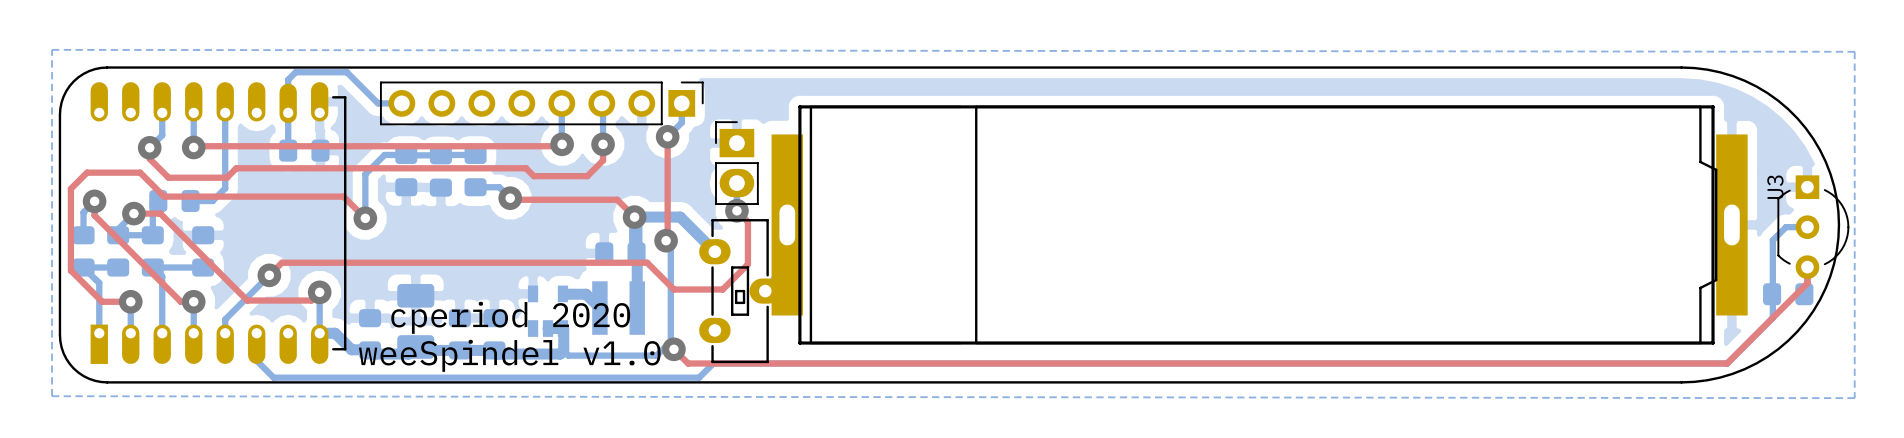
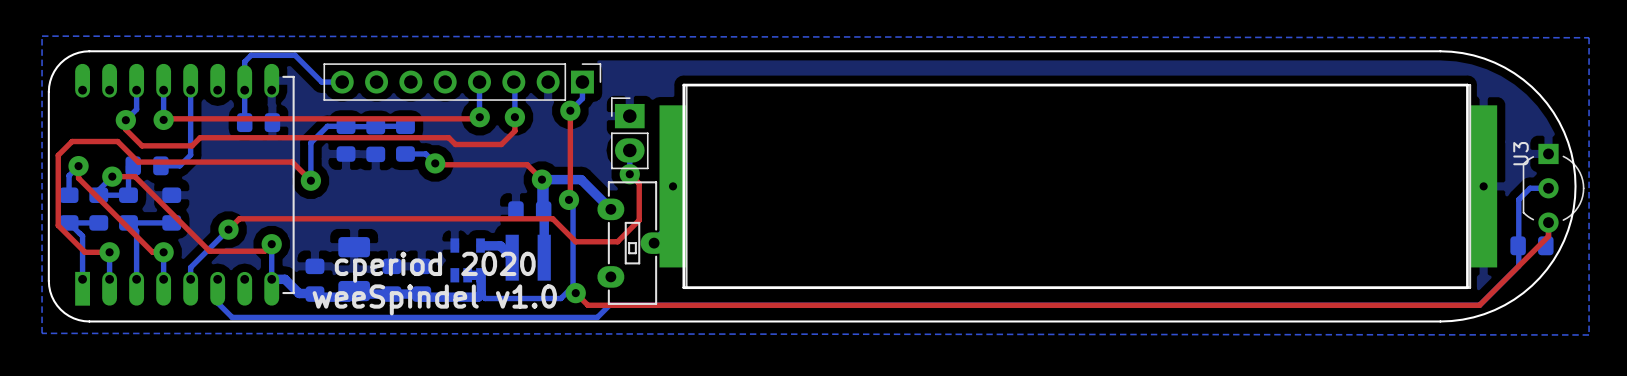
part footprint: [771, 105, 1748, 345] -> [659, 84, 1498, 289]

